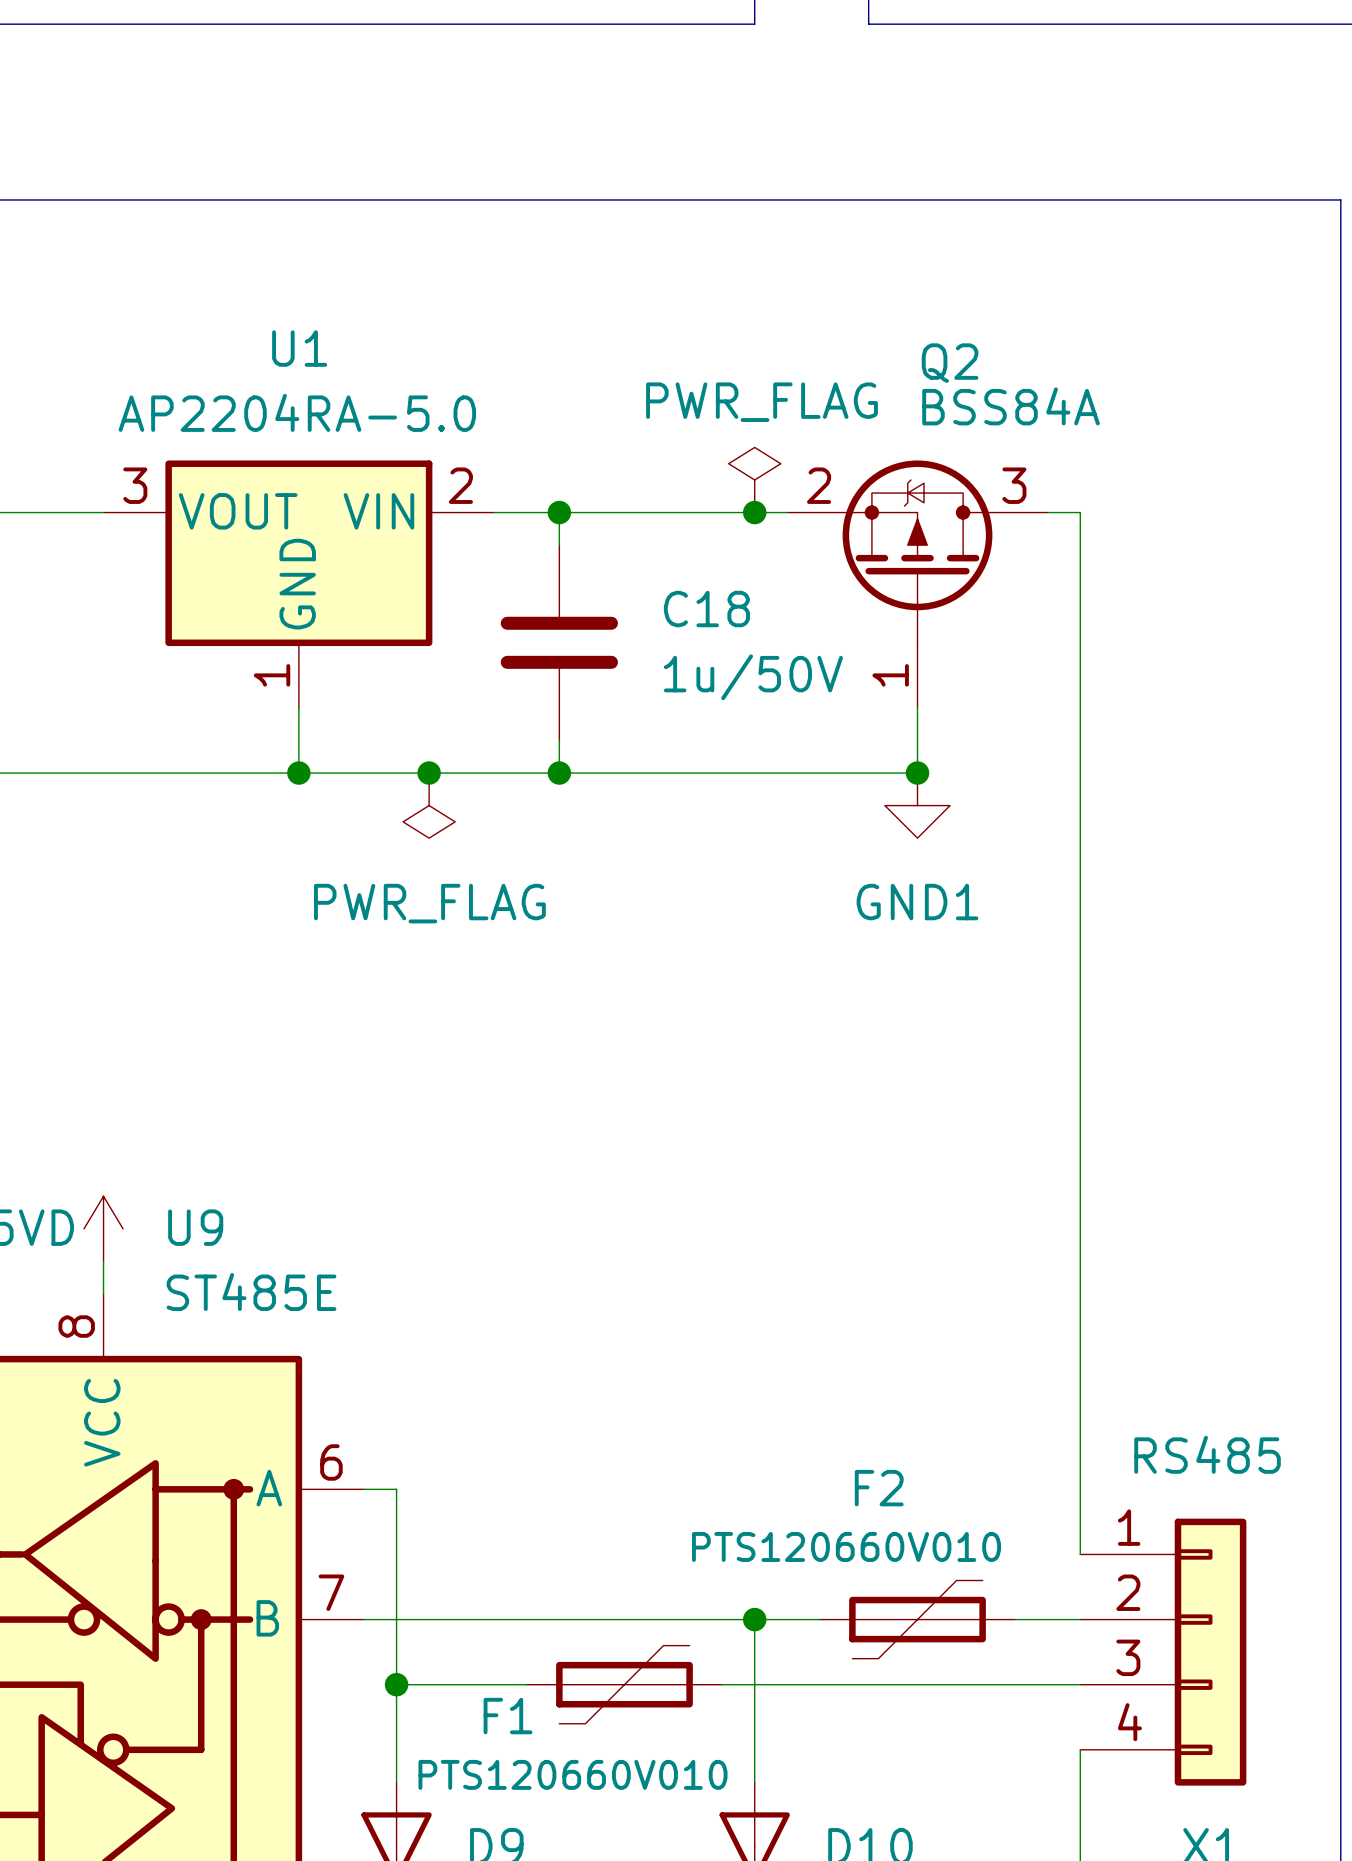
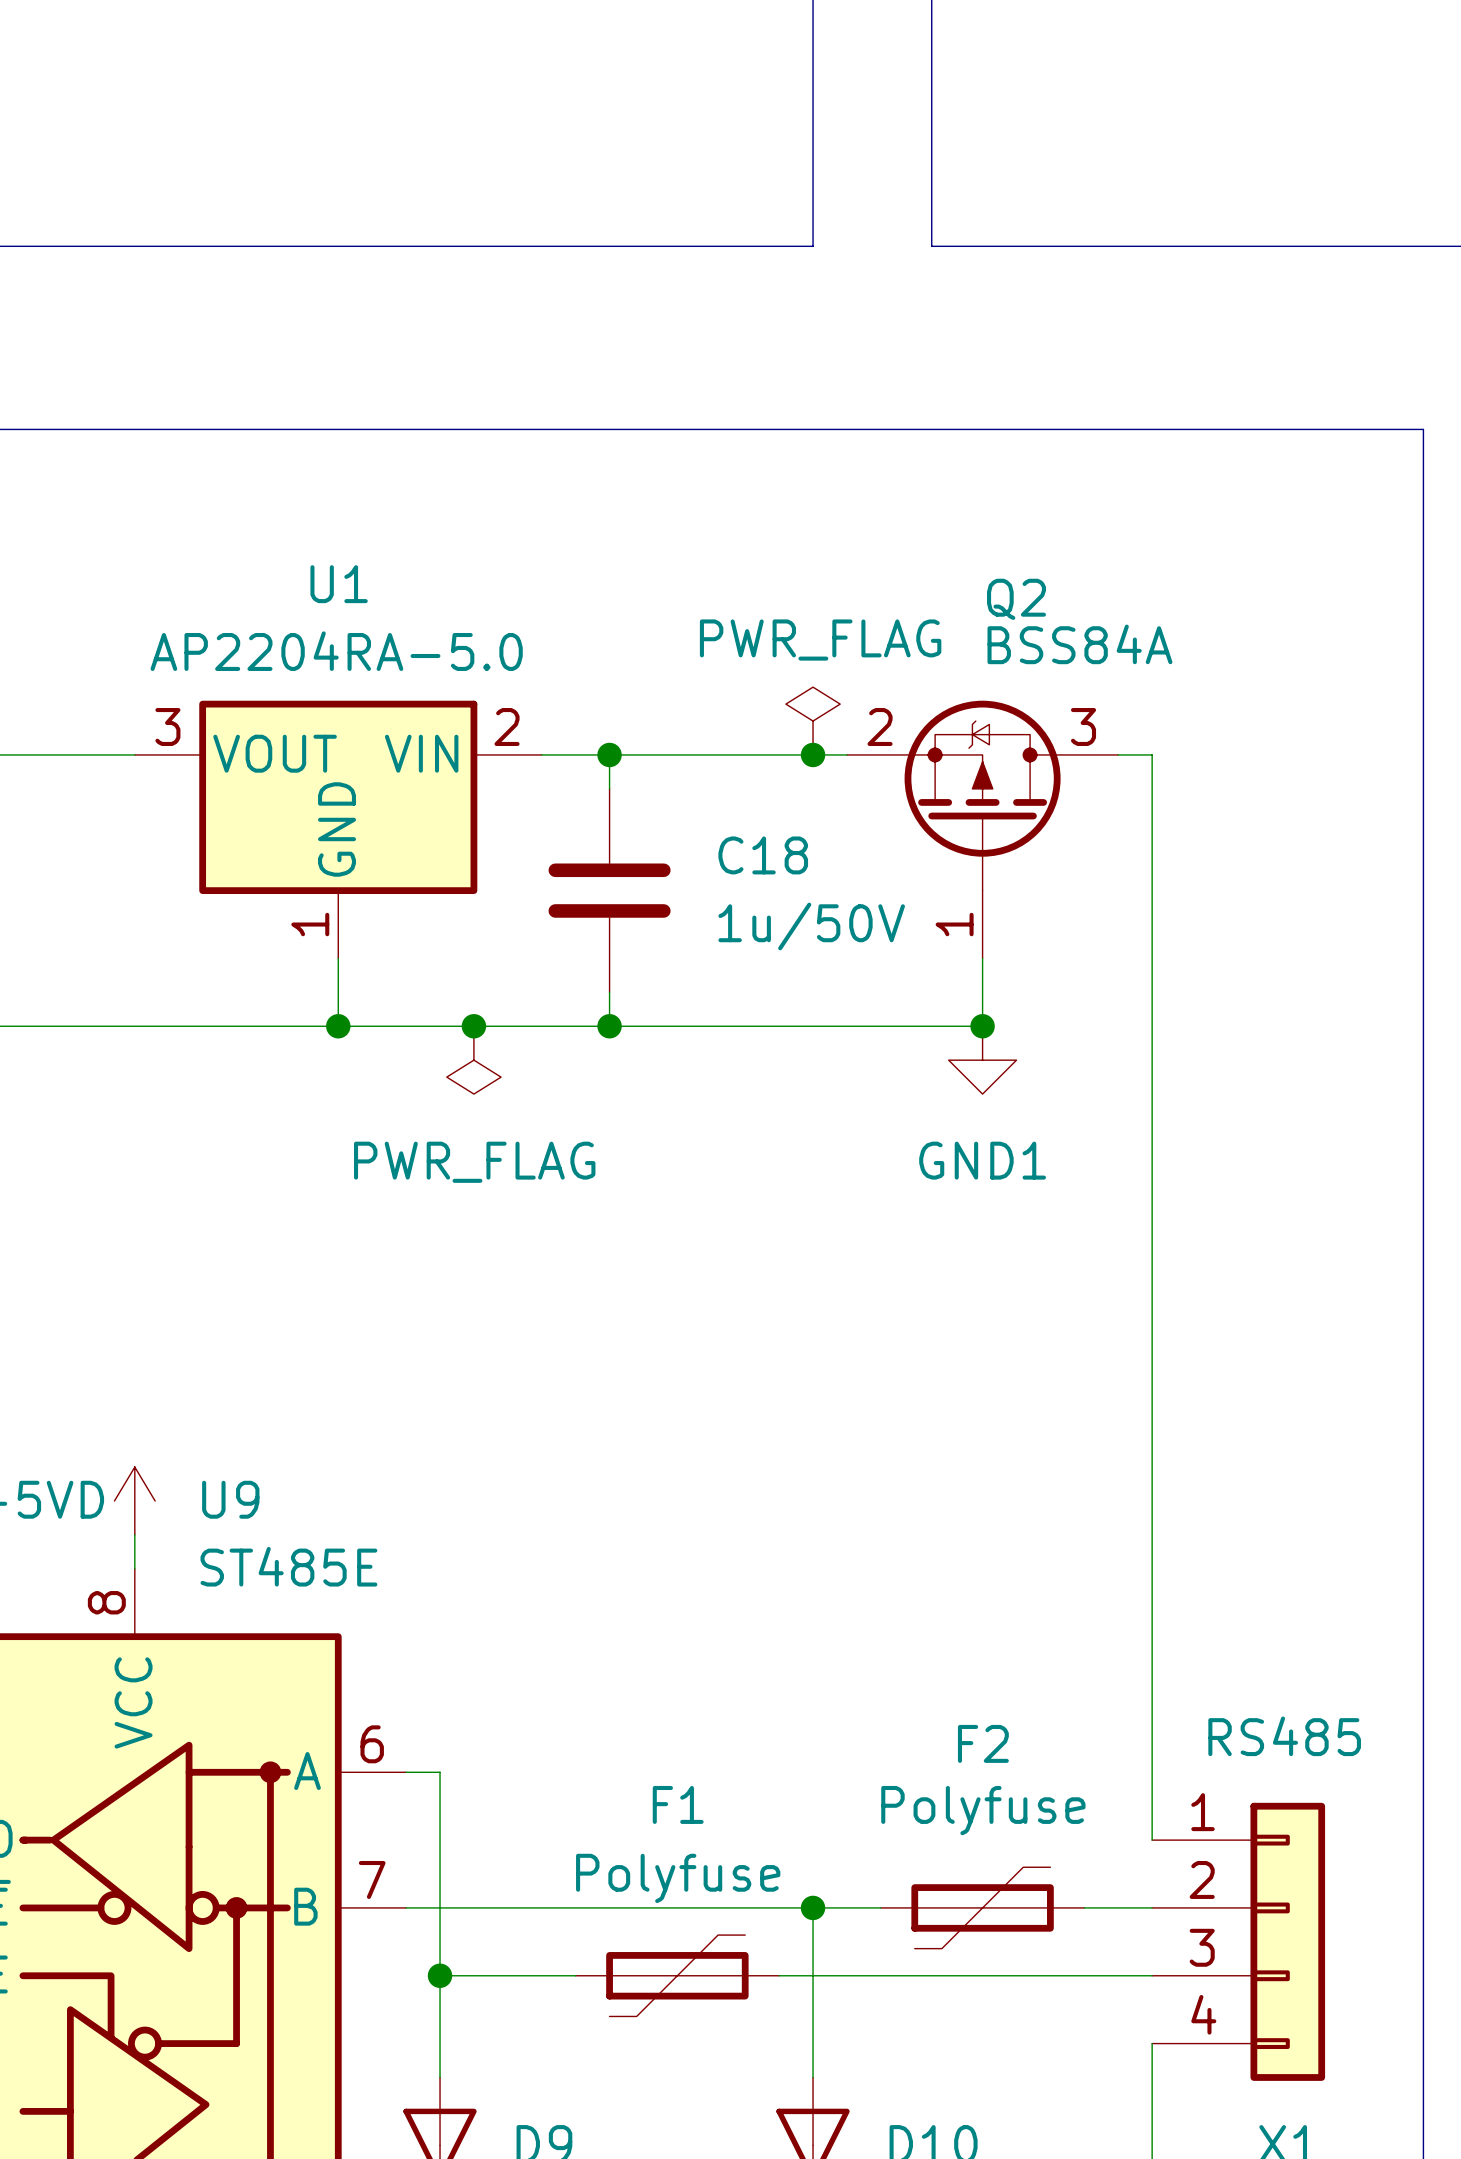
F2 name position: F2 (879, 1488) -> F2 (983, 1743)
F2 value: PTS120660V010 (846, 1546) -> Polyfuse (983, 1810)
F1 name position: F1 (508, 1716) -> F1 (678, 1804)
F1 value: PTS120660V010 (573, 1774) -> Polyfuse (678, 1878)

